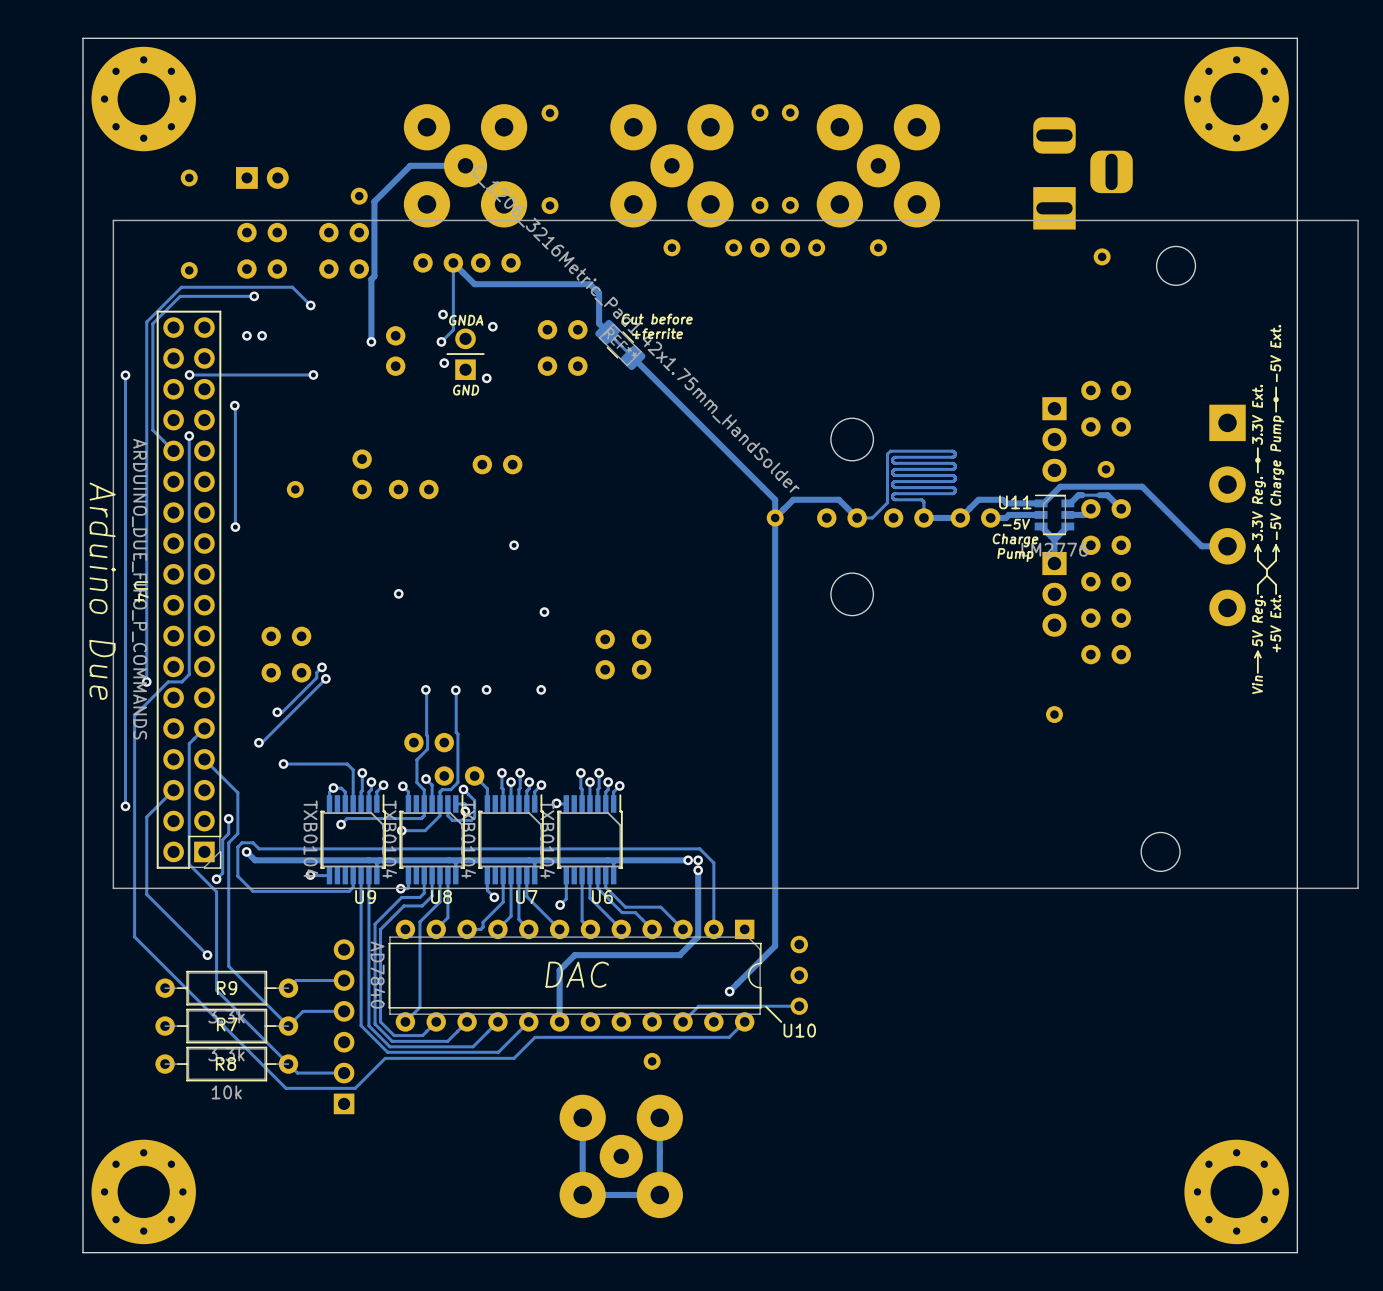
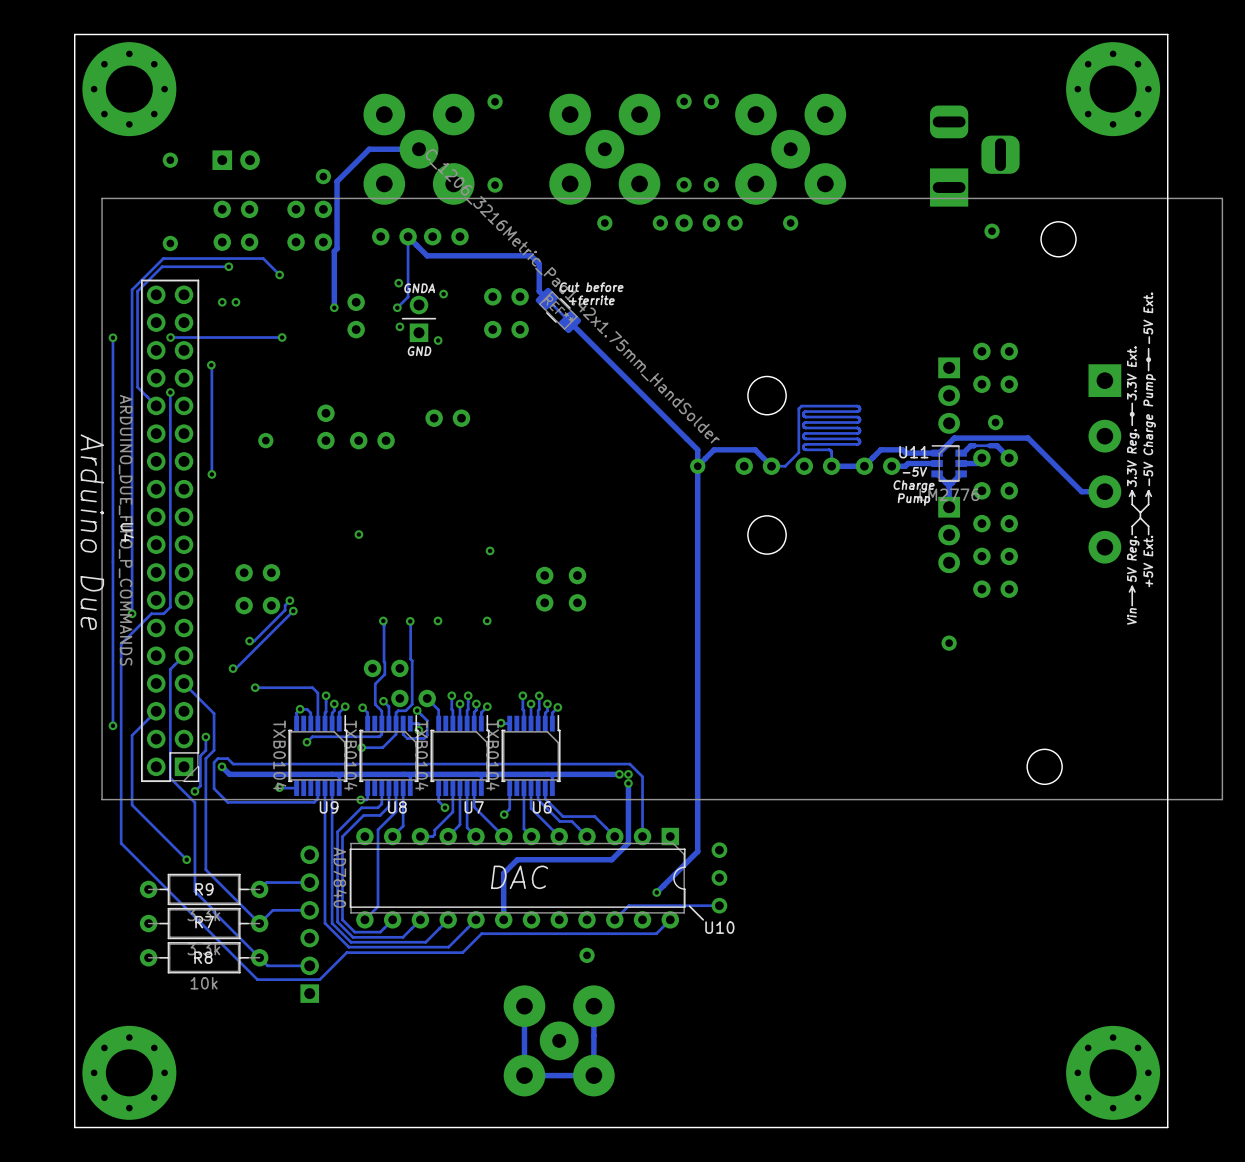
via: (514, 545) -> none

